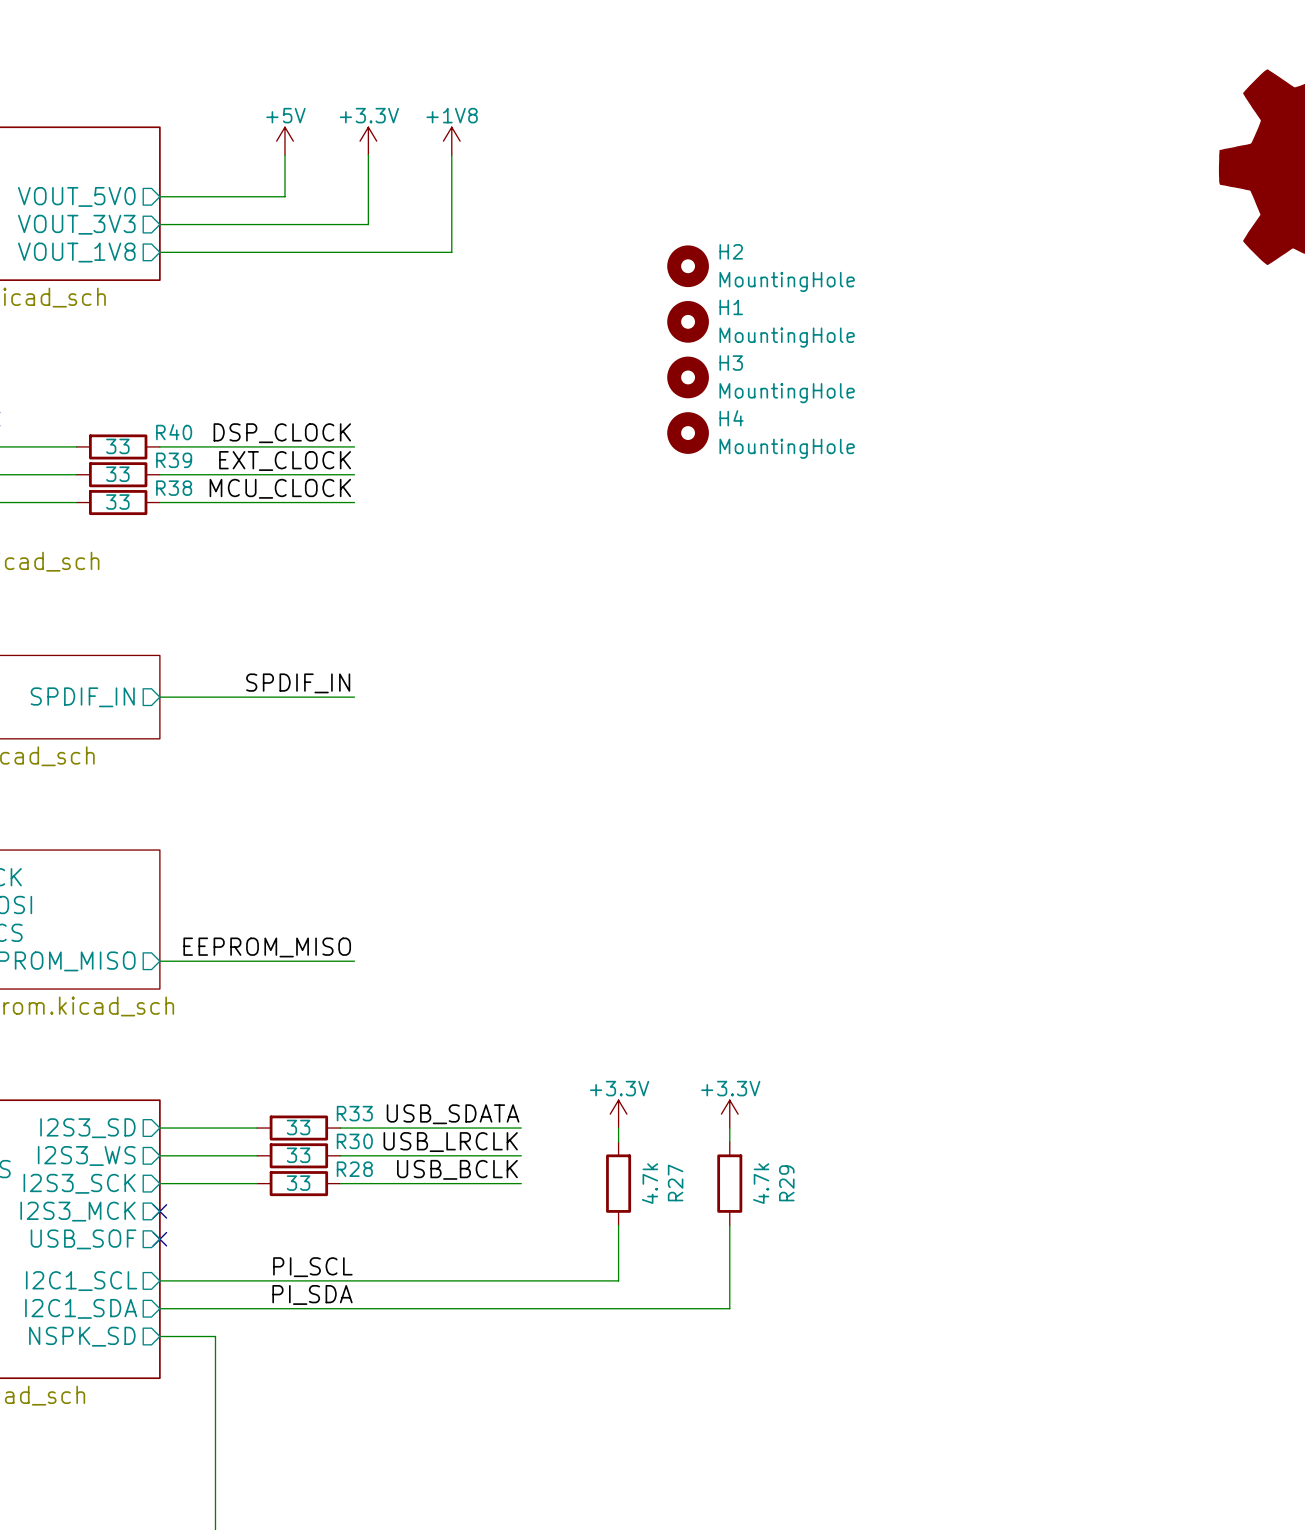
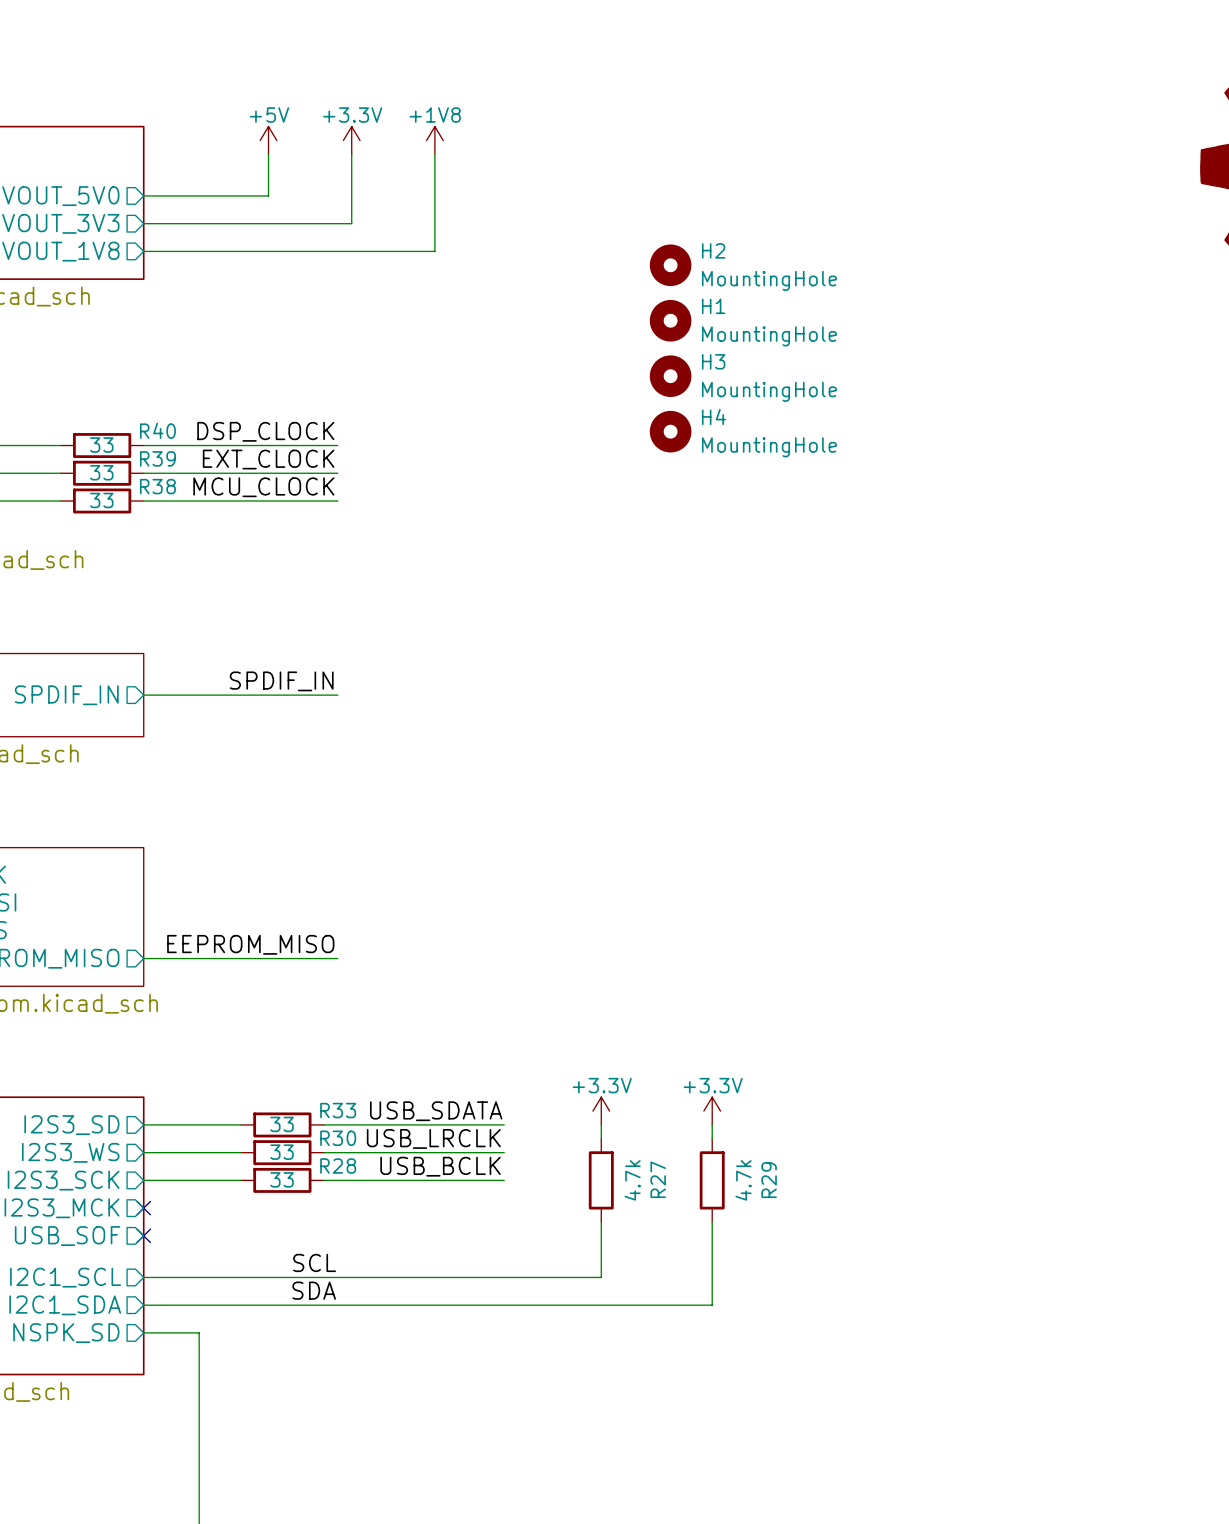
label: PI_SCL (312, 1267) -> SCL (314, 1262)
label: PI_SDA (312, 1294) -> SDA (314, 1290)

